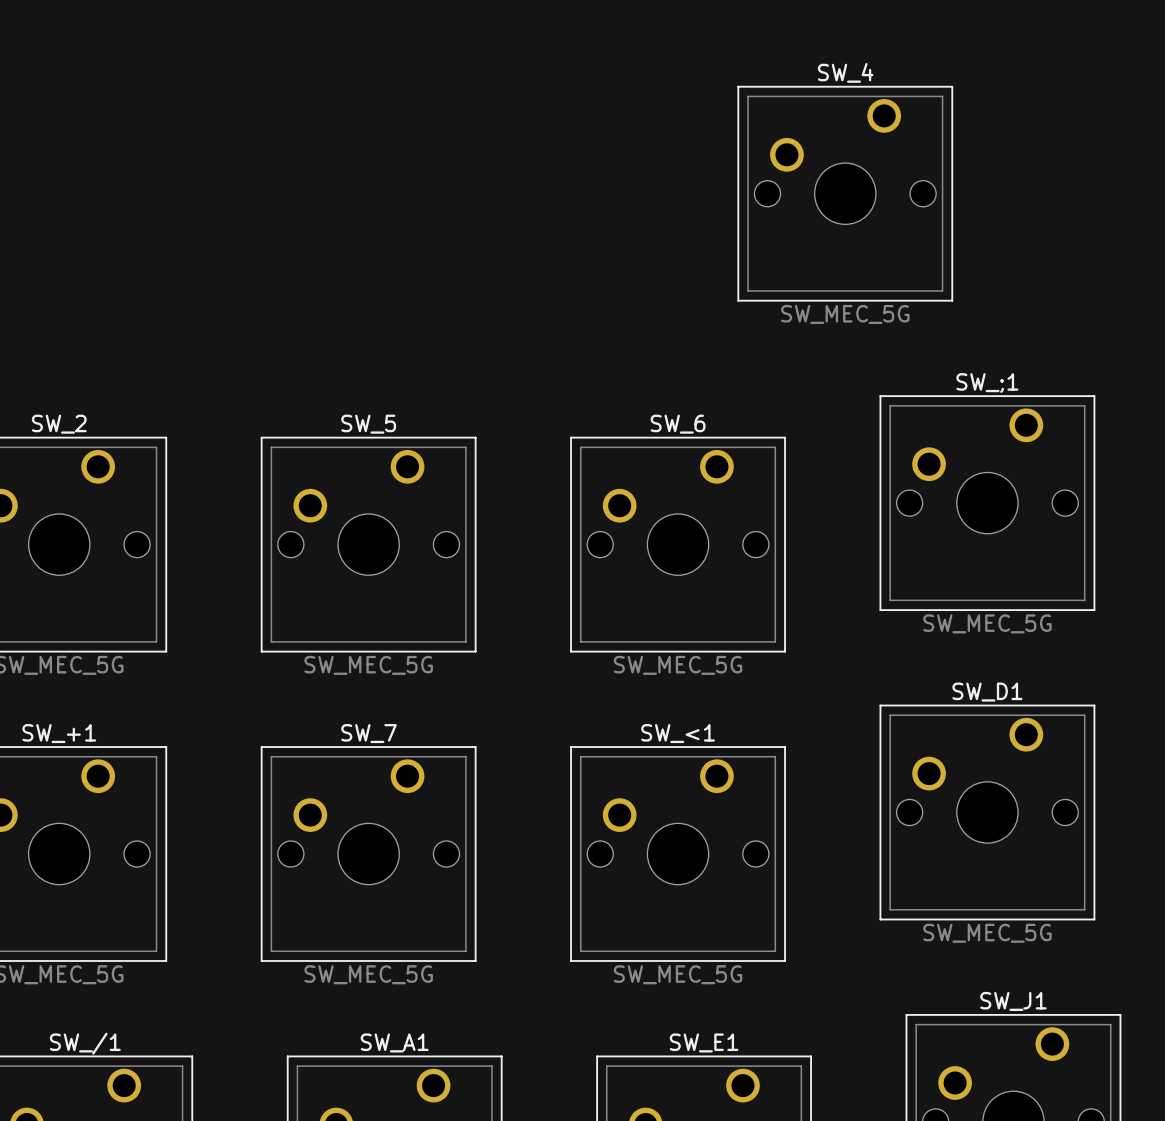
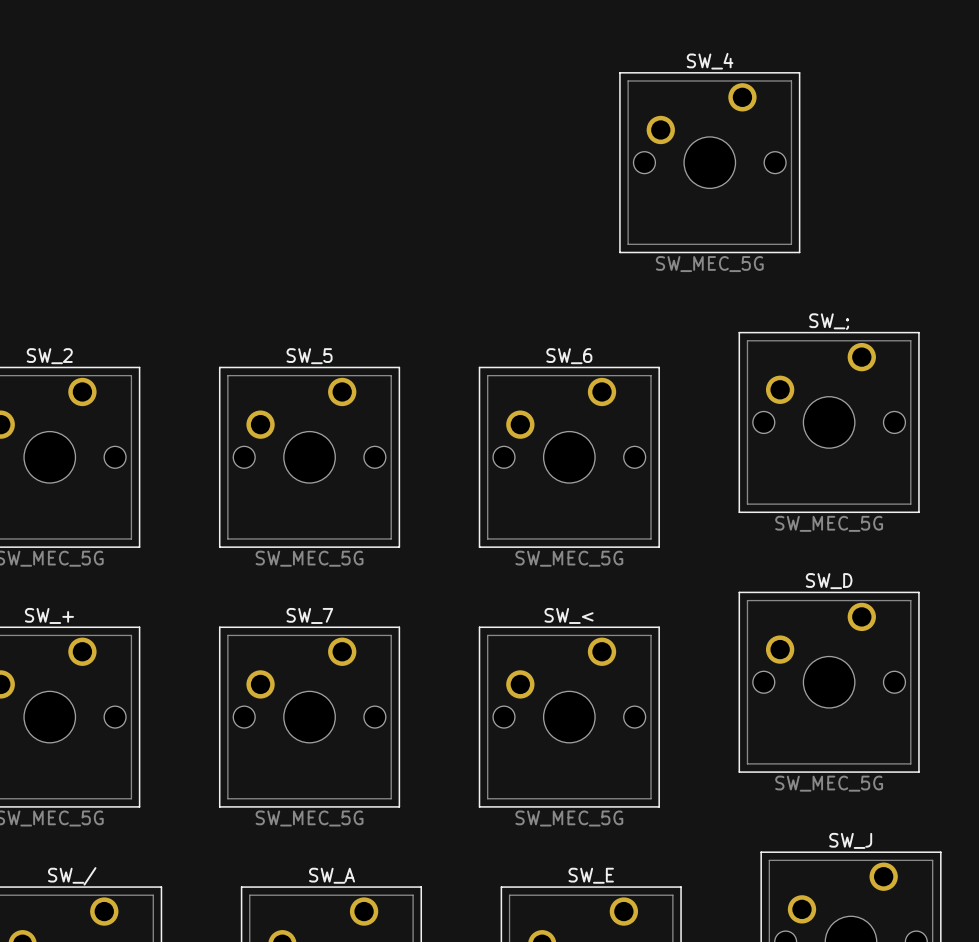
SW_;1 name: SW_;1 (987, 383) -> SW_; (829, 321)
SW_D1 name: SW_D1 (987, 692) -> SW_D (829, 581)
SW_+1 name: SW_+1 (59, 733) -> SW_+ (49, 615)
SW_<1 name: SW_<1 (678, 733) -> SW_< (569, 615)
SW_J1 name: SW_J1 (1013, 1001) -> SW_J (850, 840)
SW_A1 name: SW_A1 (394, 1042) -> SW_A (332, 875)
SW_E1 name: SW_E1 (704, 1042) -> SW_E (591, 875)
SW_/1 name: SW_/1 (85, 1043) -> SW_/ (72, 876)

